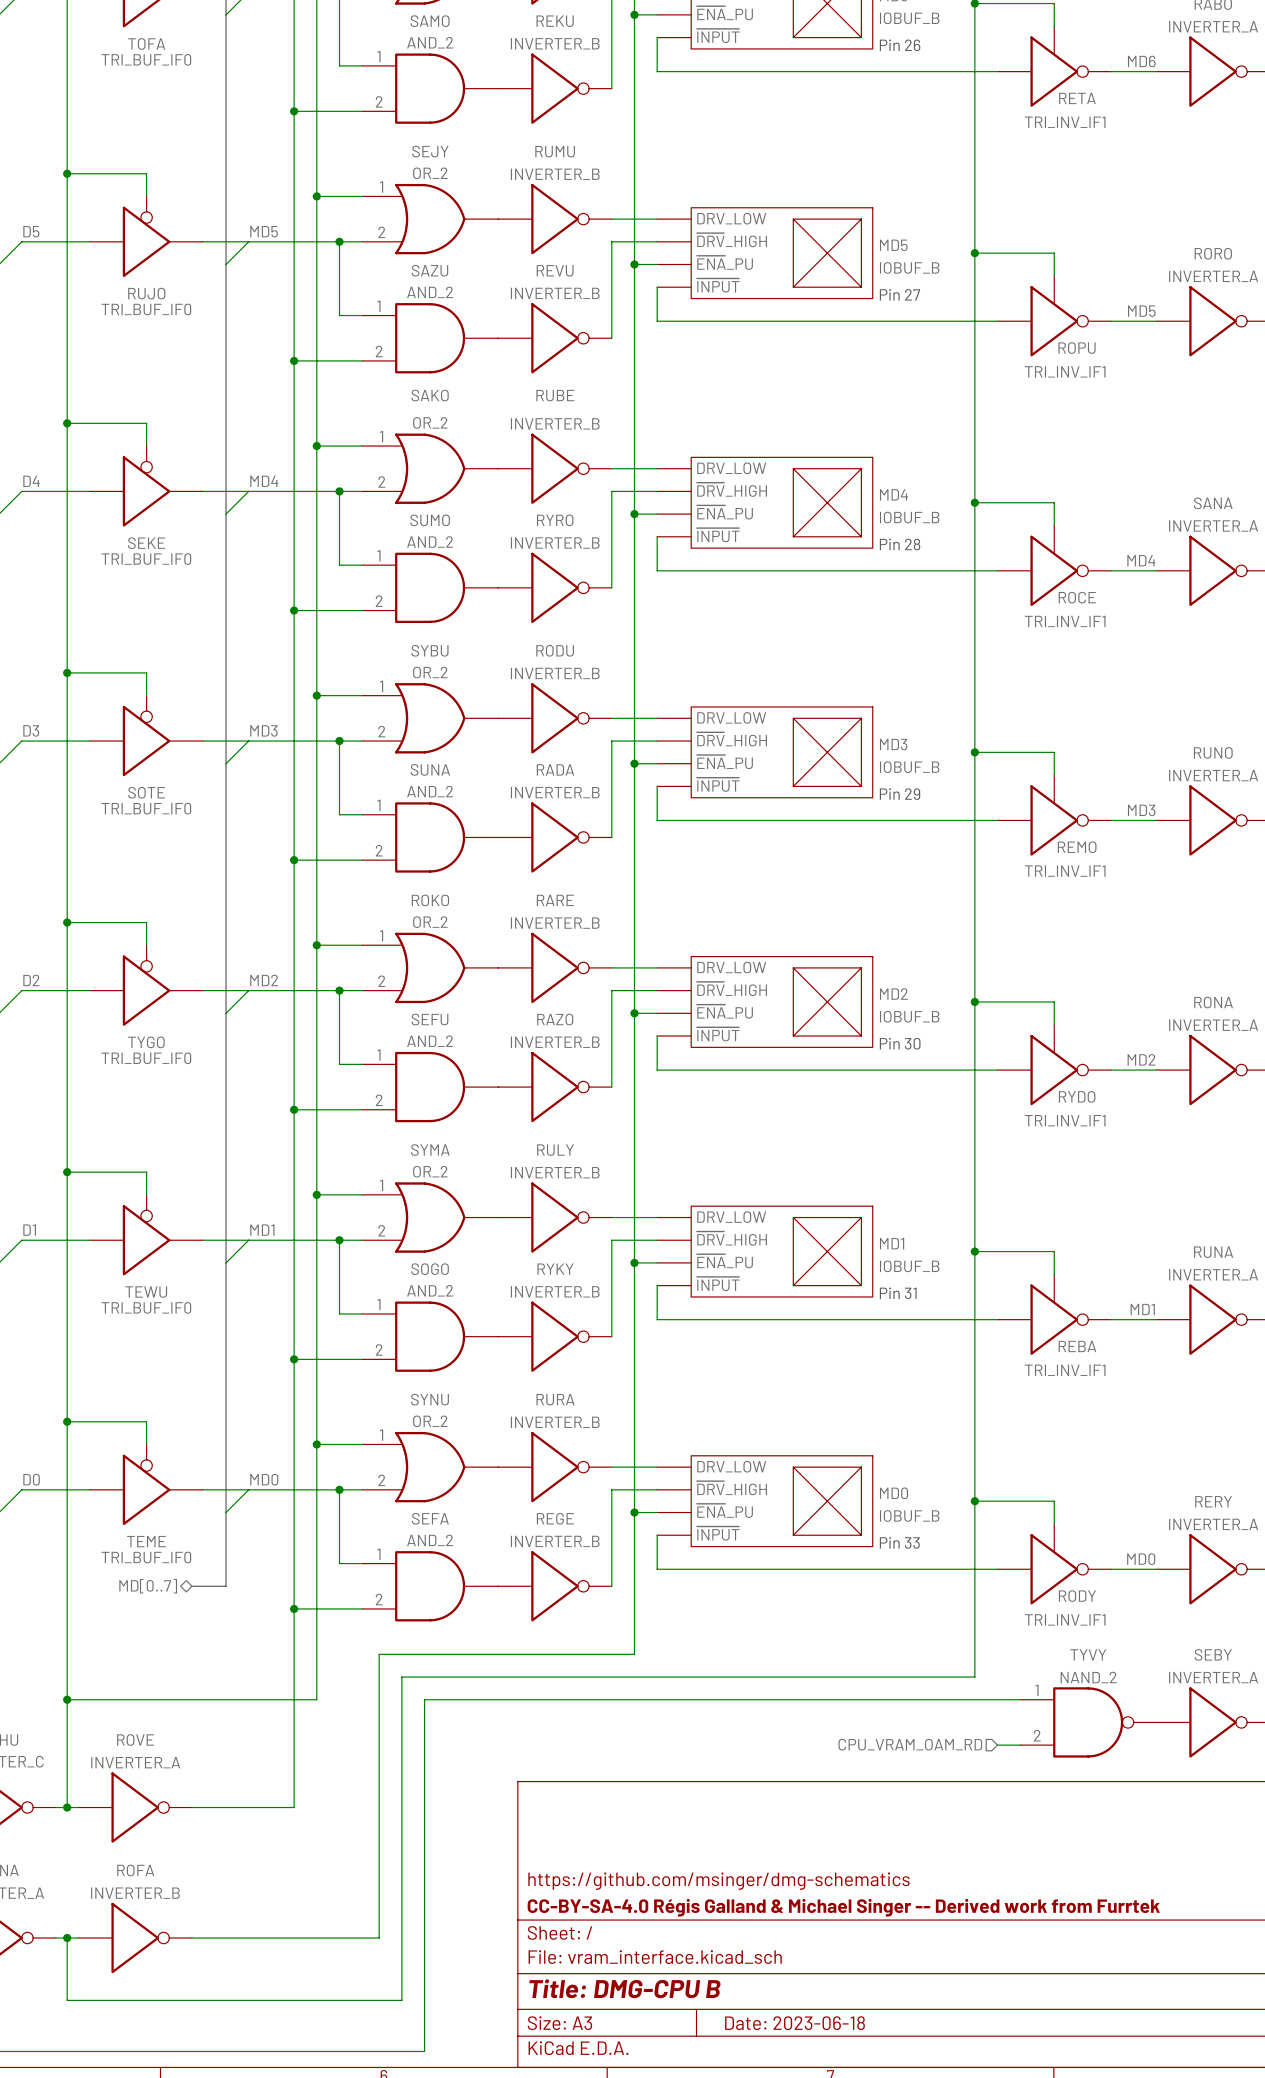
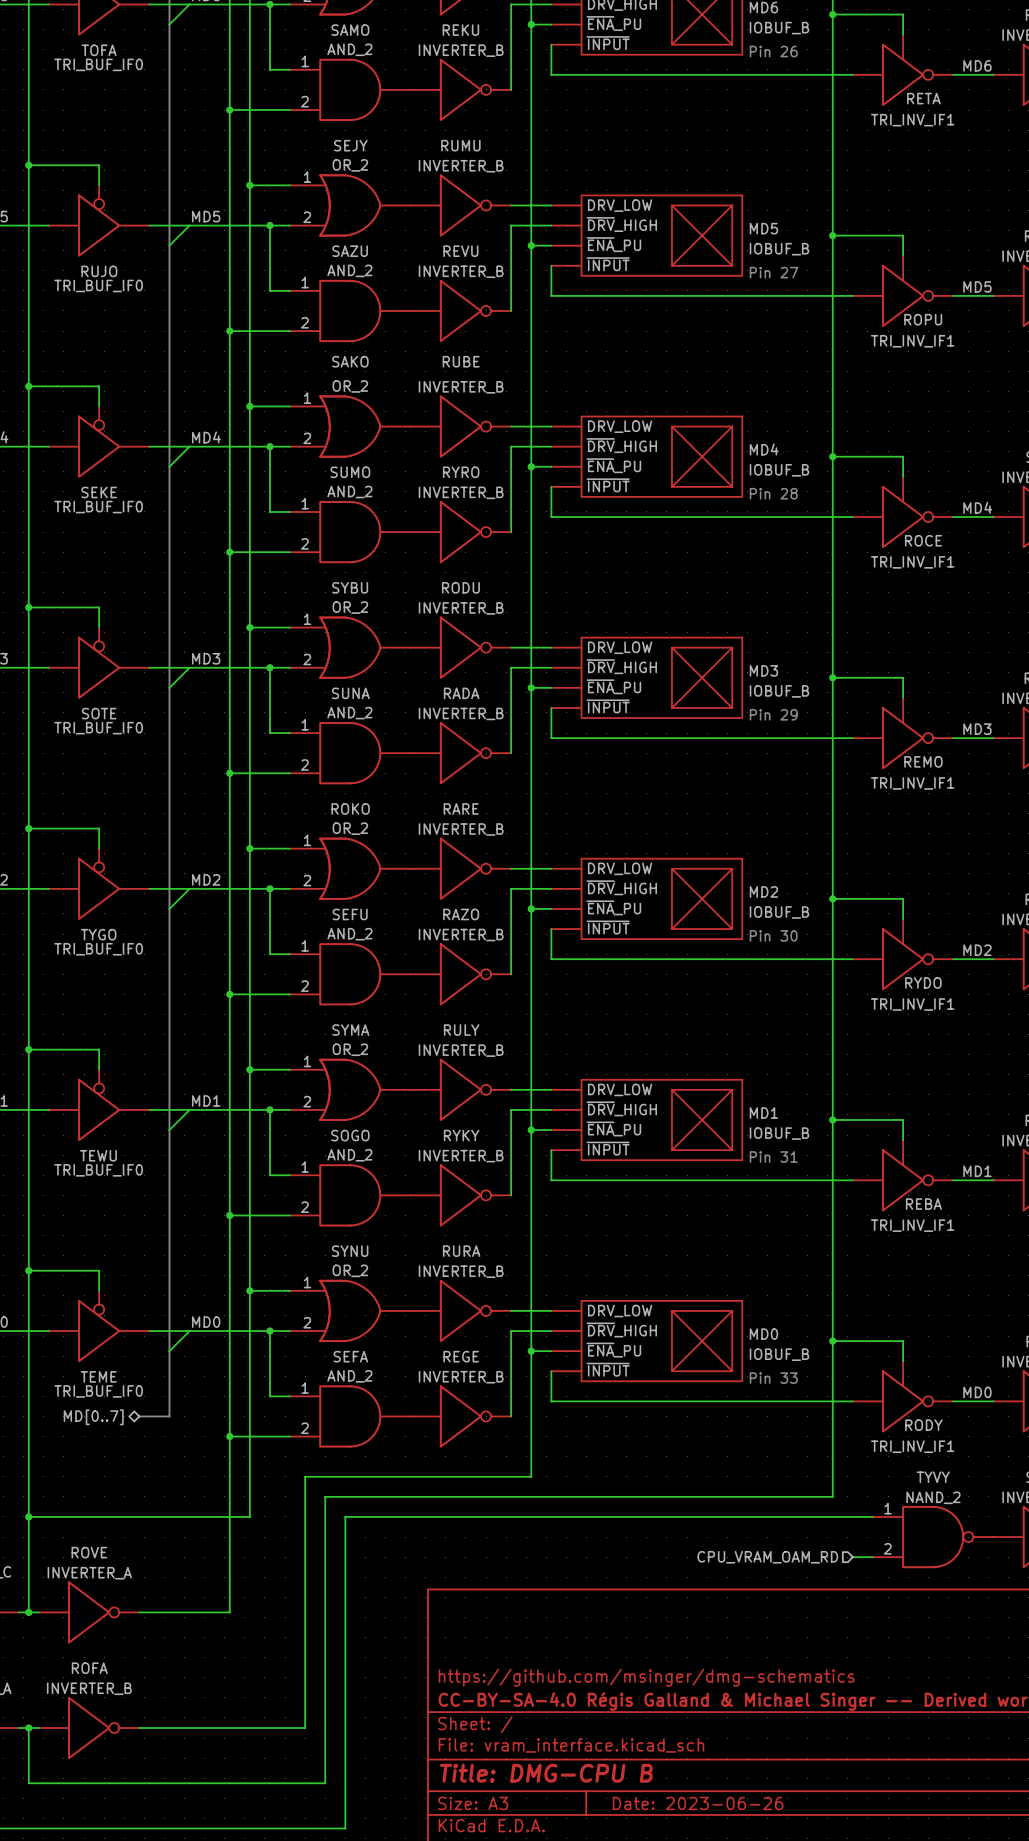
title block: Date: 2023-06-18 (795, 2023) -> Date: 2023-06-26 (698, 1803)

